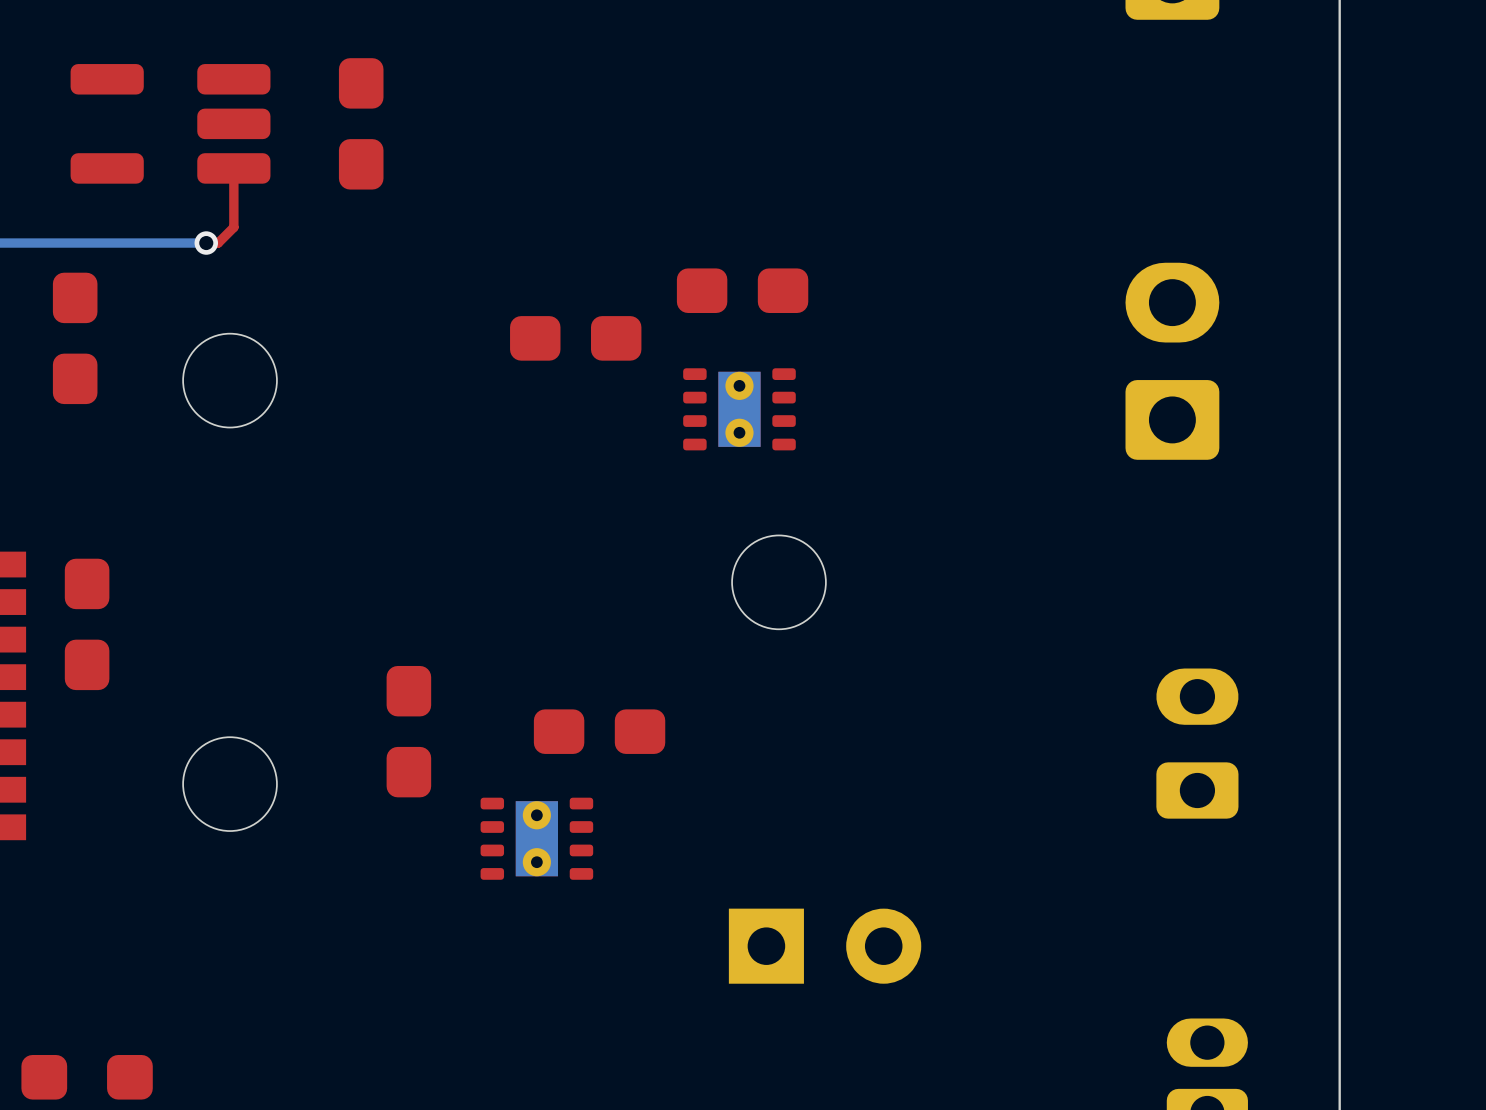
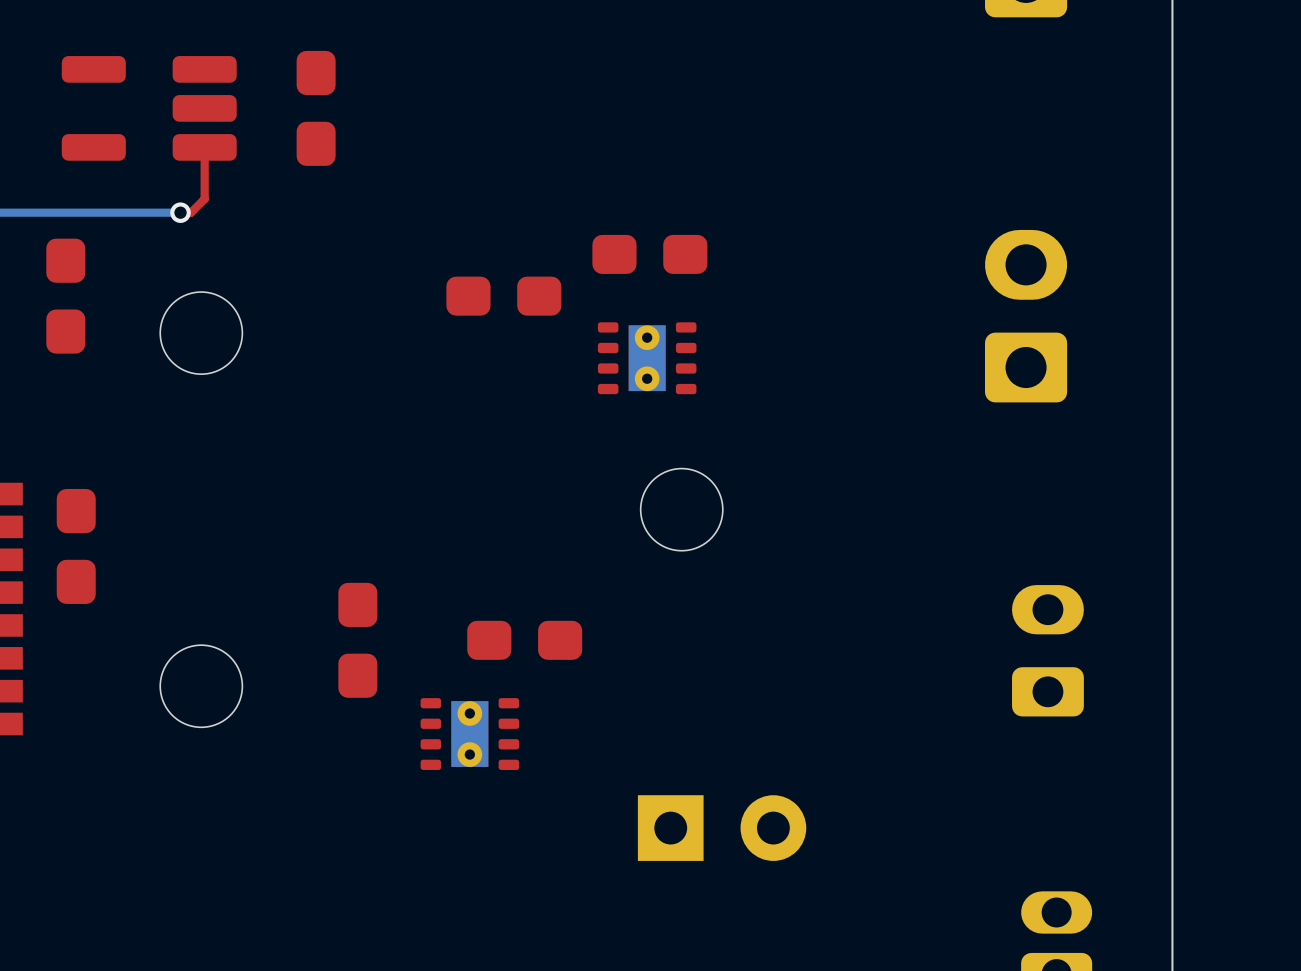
part: (87, 1077) -> none

